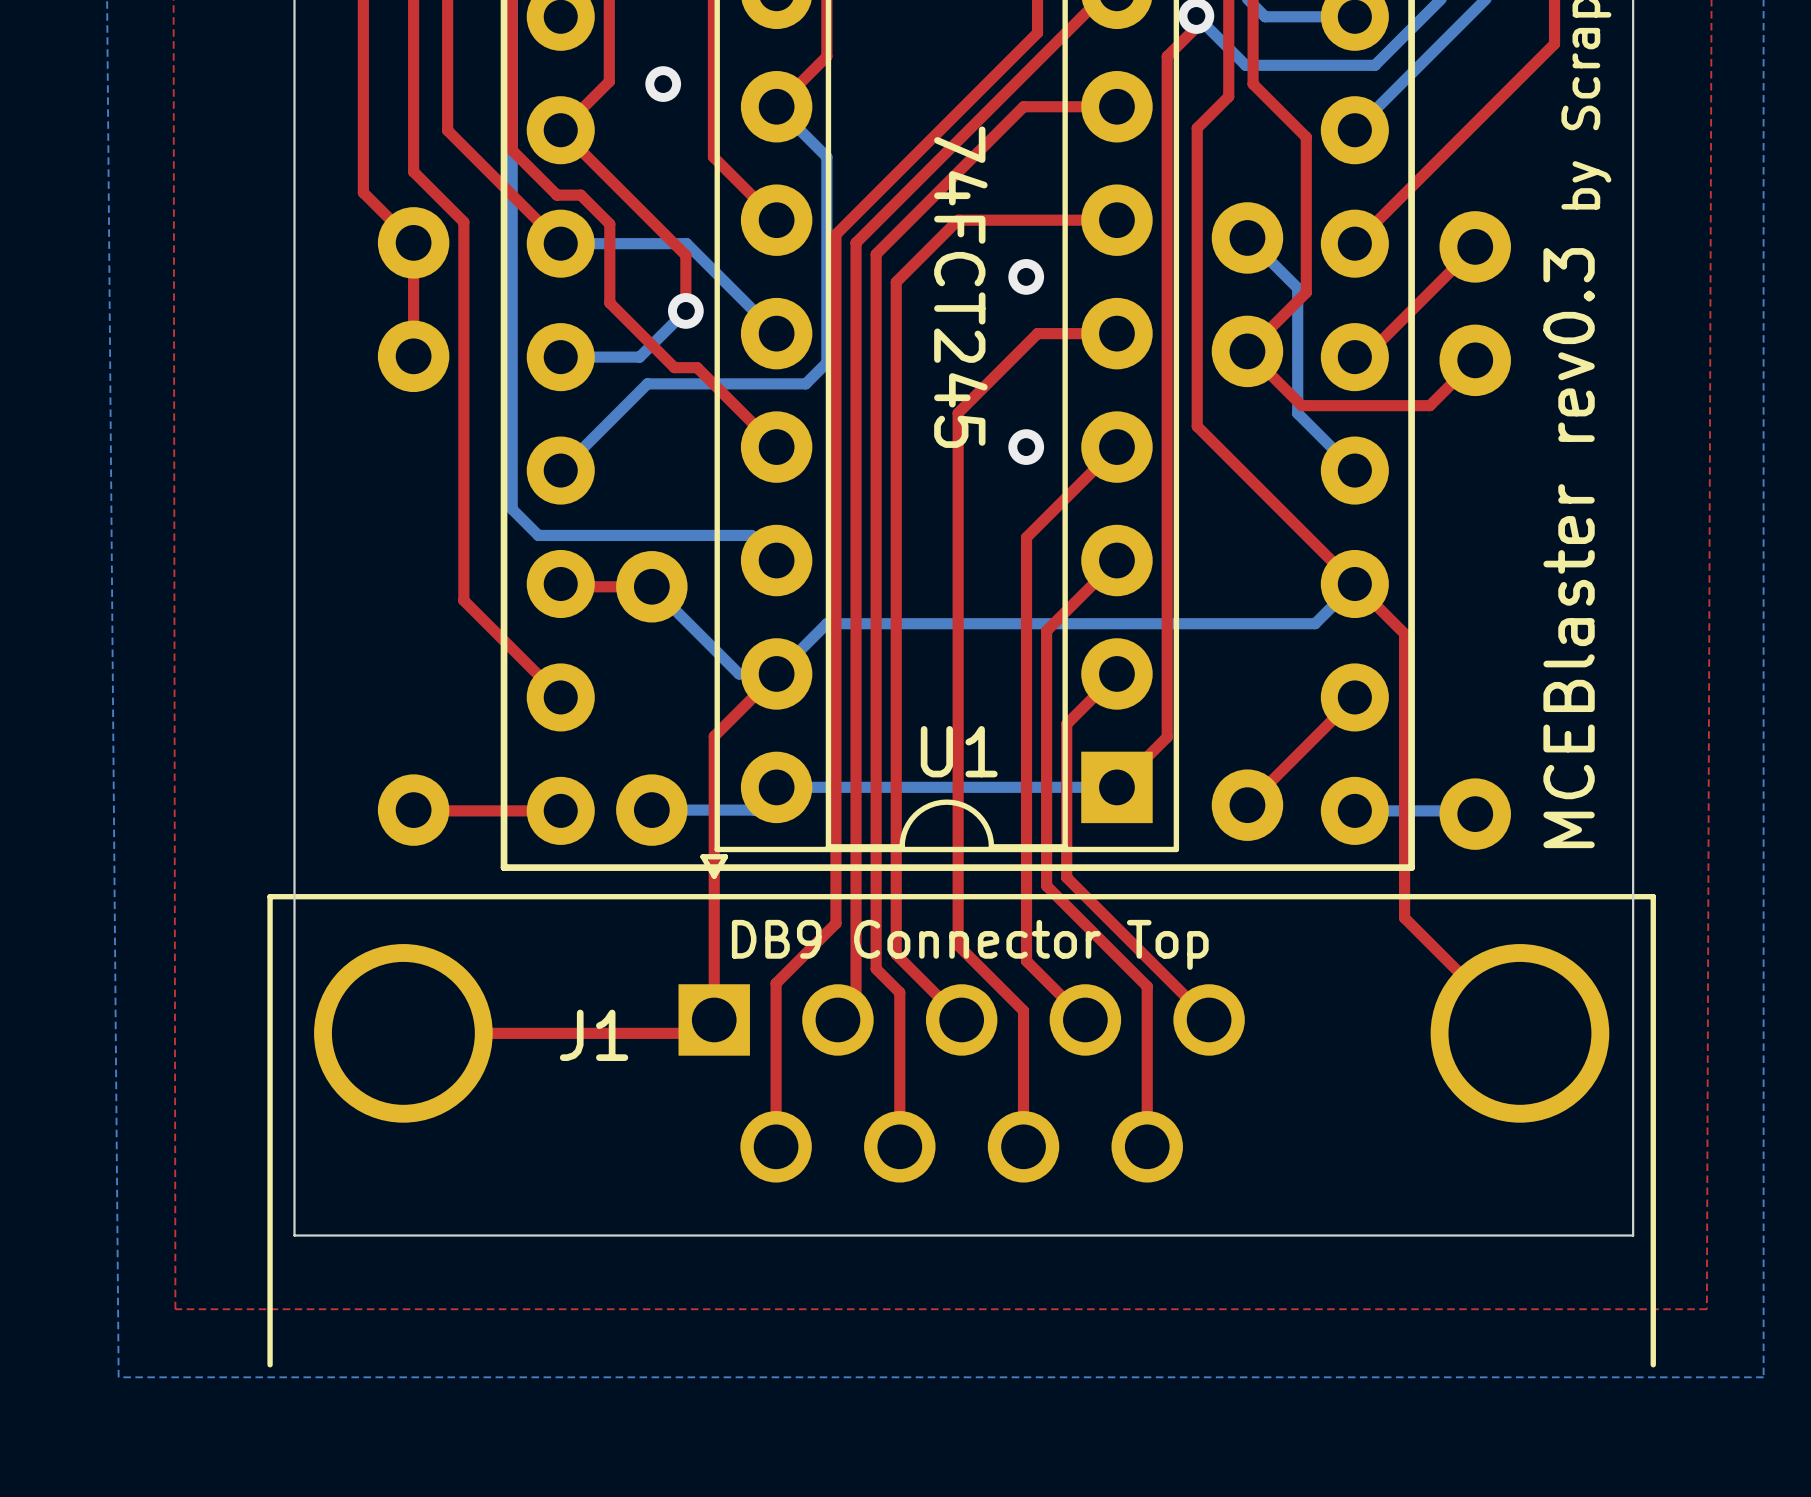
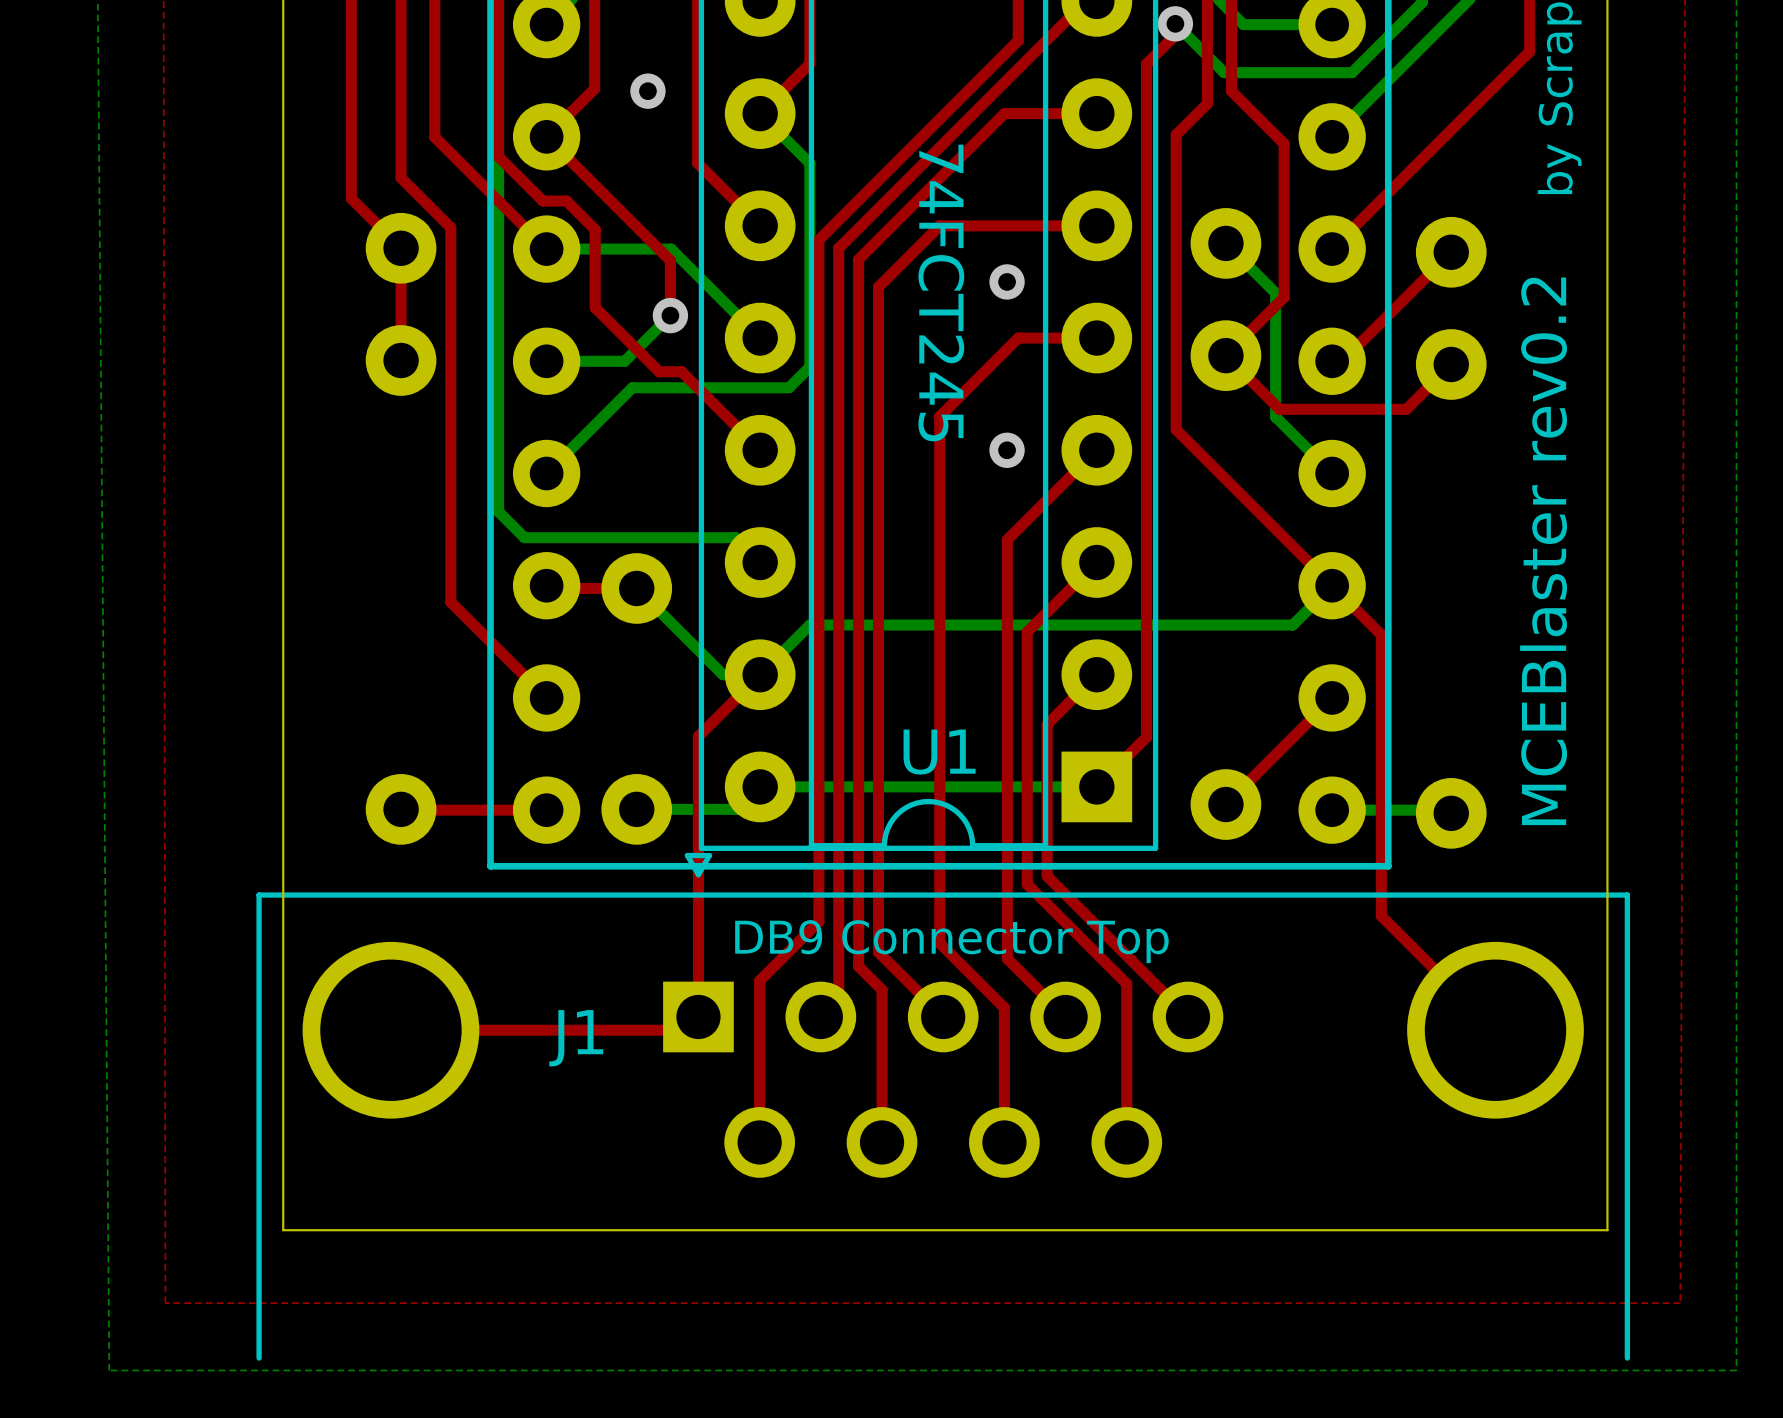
text: MCEBlaster rev0.3 (1569, 548) -> MCEBlaster rev0.2 (1543, 551)

